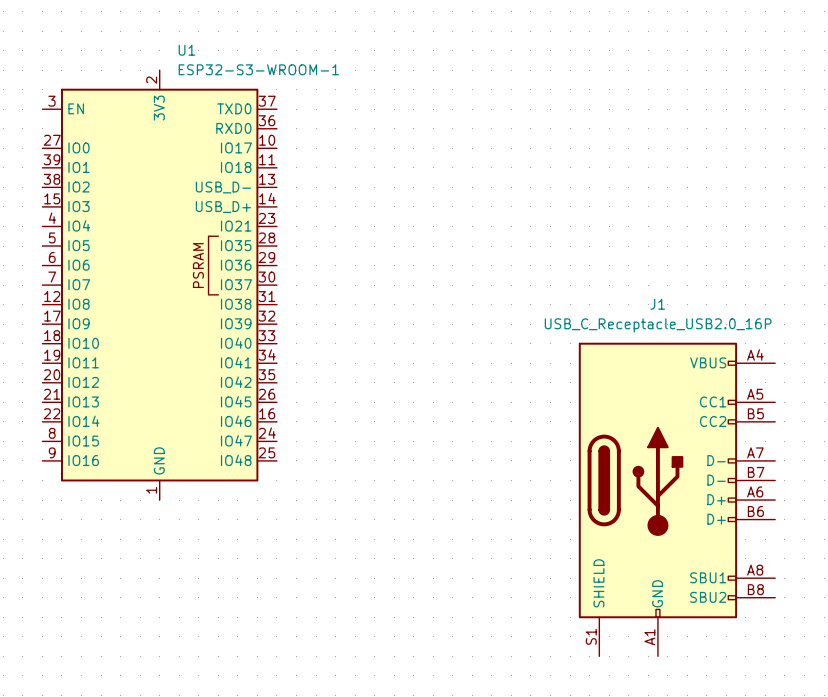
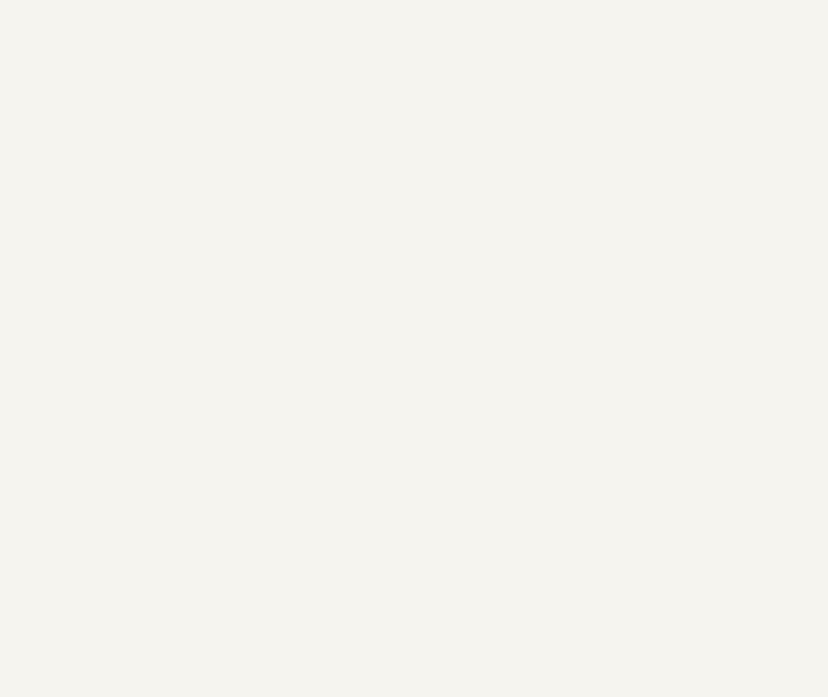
U1: ESP32-S3-WROOM-1 (159, 285) -> none
J1: USB_C_Receptacle_USB2.0_16P (677, 499) -> none

